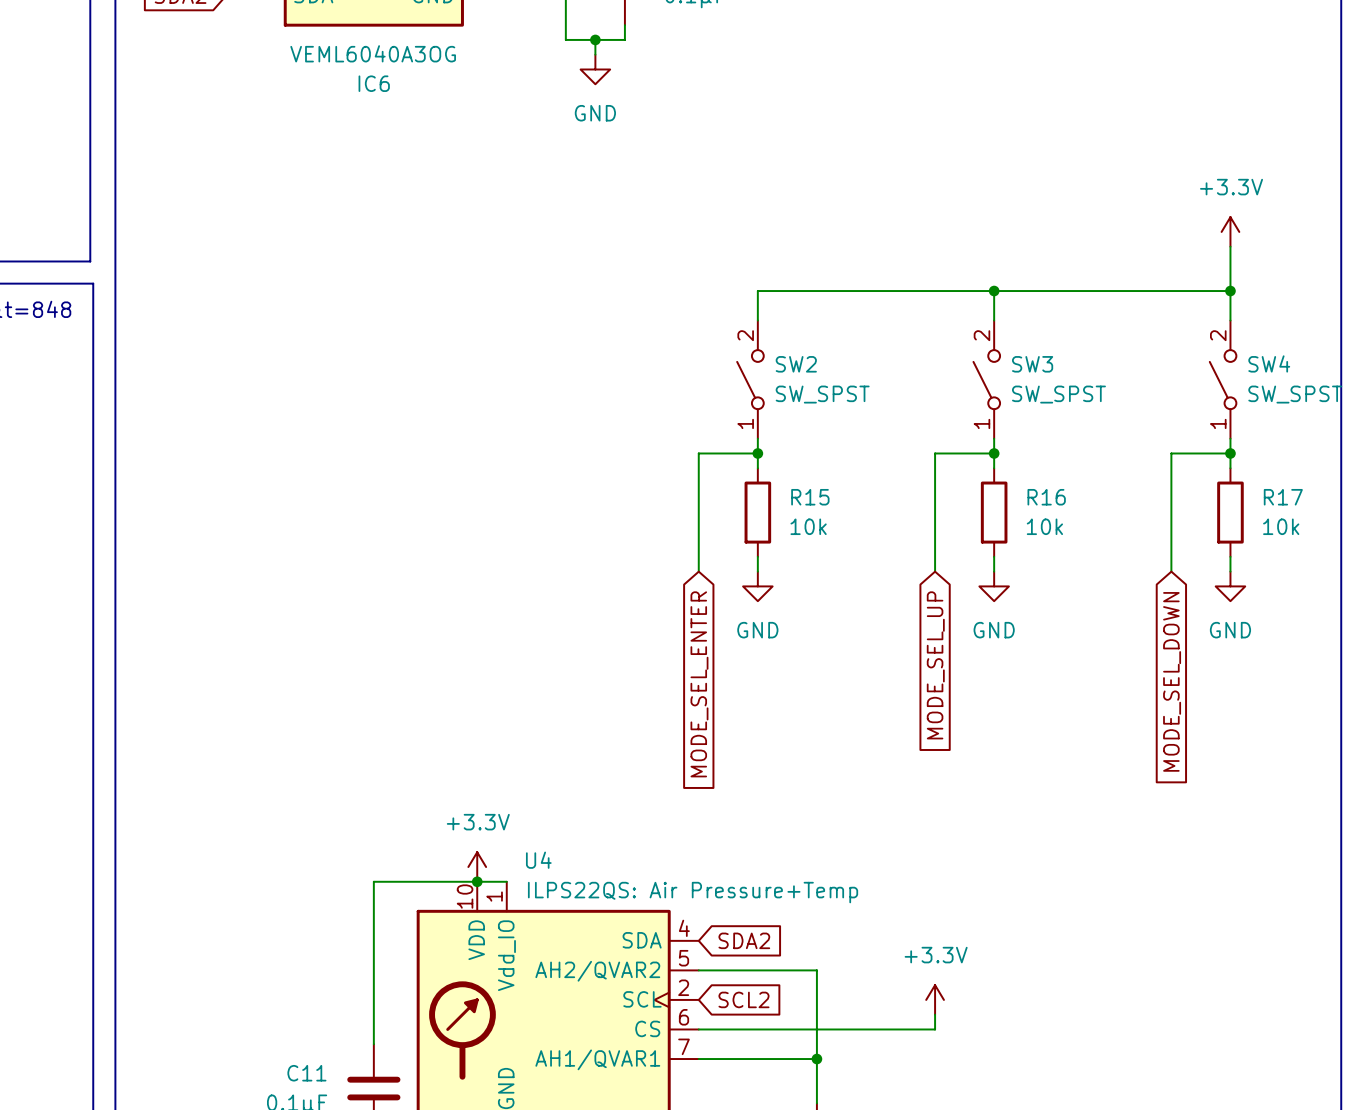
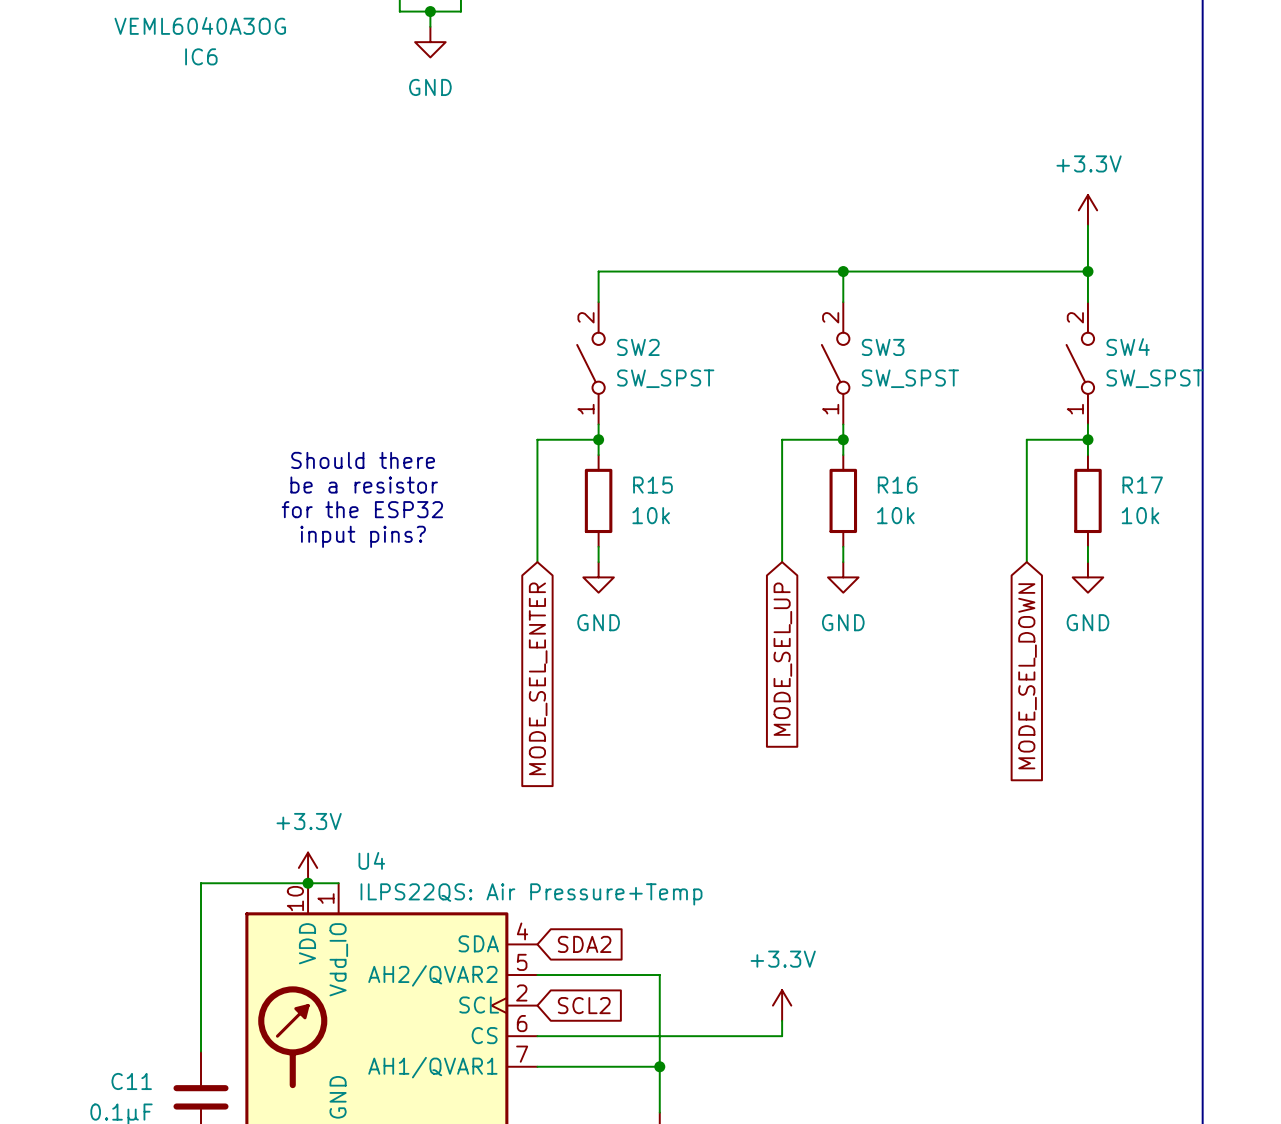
text: none -> Should there (363, 460)
text: none -> be a resistor (364, 485)
text: none -> for the ESP32 (362, 509)
text: none -> input pins? (363, 536)

